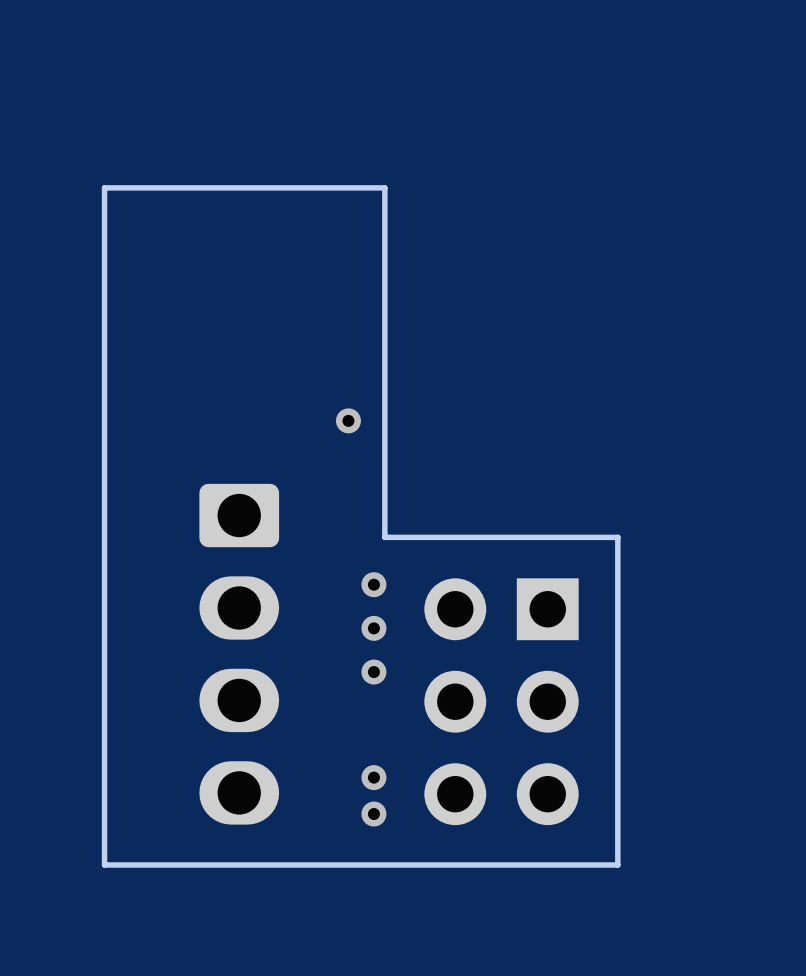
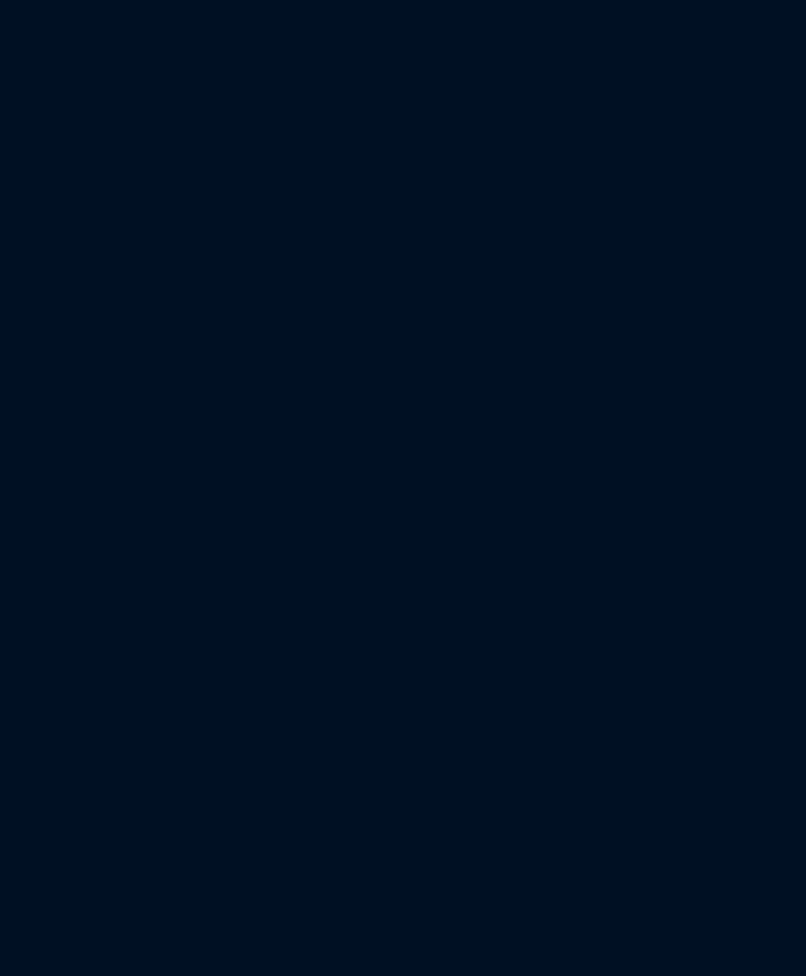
board edge: (384, 187) (384, 537) (617, 537) (617, 864) (104, 864) (104, 187) (384, 187) -> none
via: (348, 420) -> none
via: (373, 584) -> none
via: (373, 628) -> none
part: (239, 654) -> none
via: (373, 672) -> none
part: (501, 701) -> none
via: (373, 777) -> none
via: (373, 814) -> none

